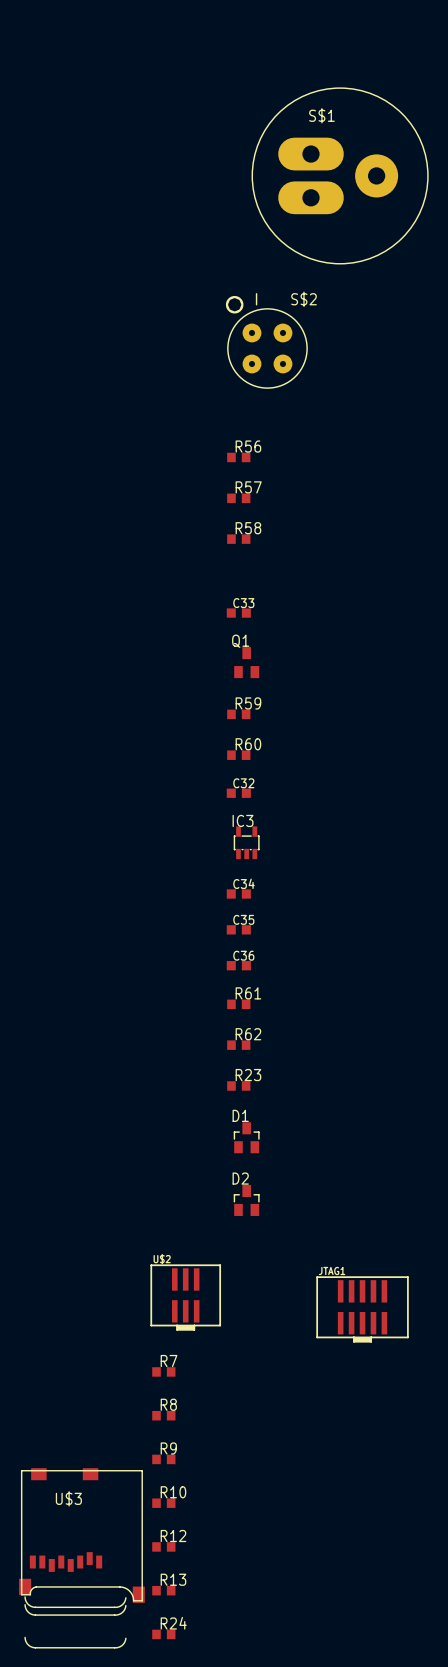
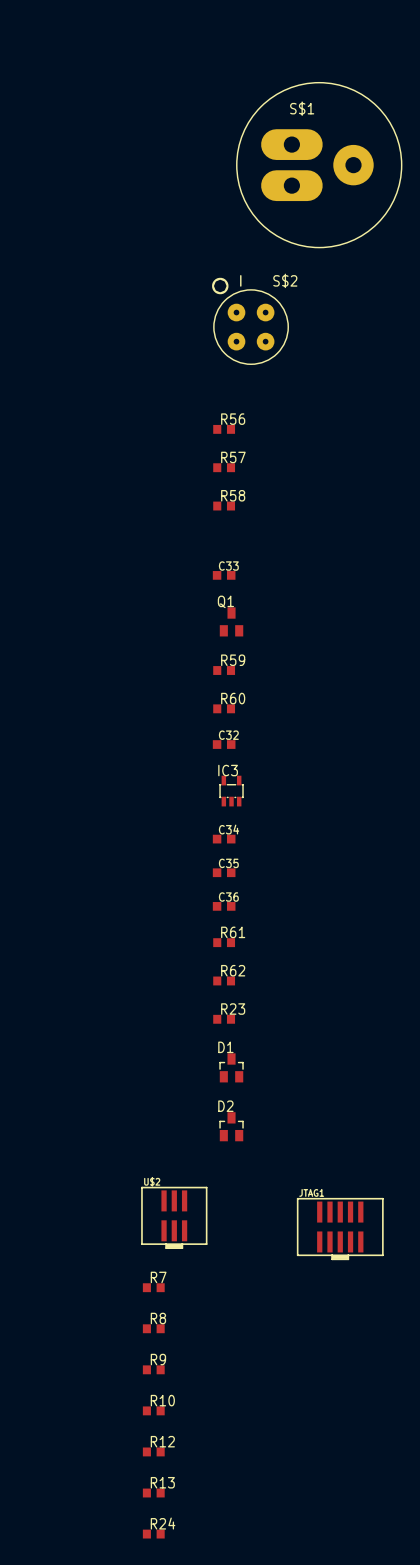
U$3: (81, 1558) -> none

